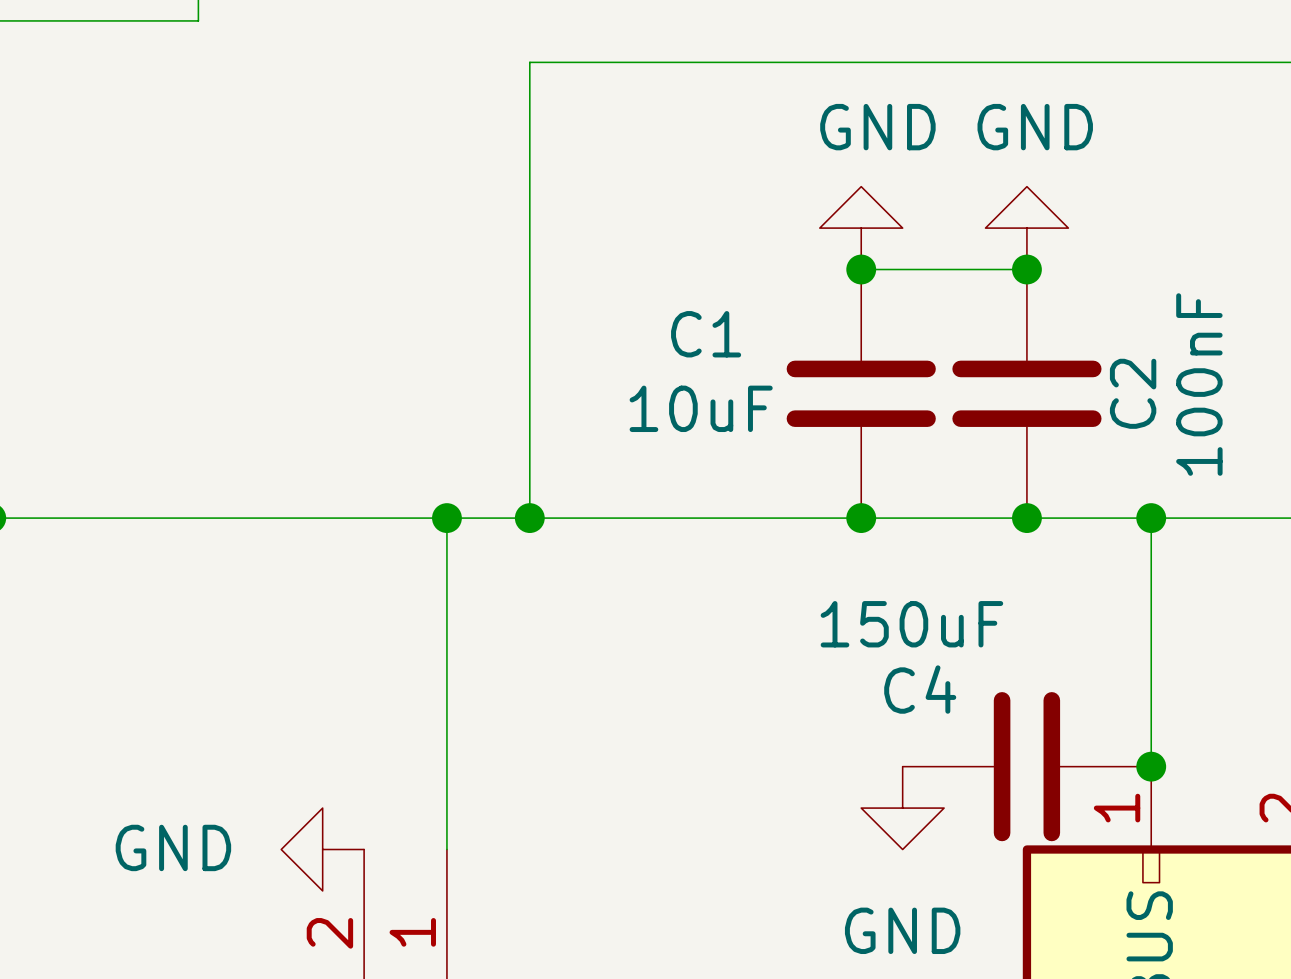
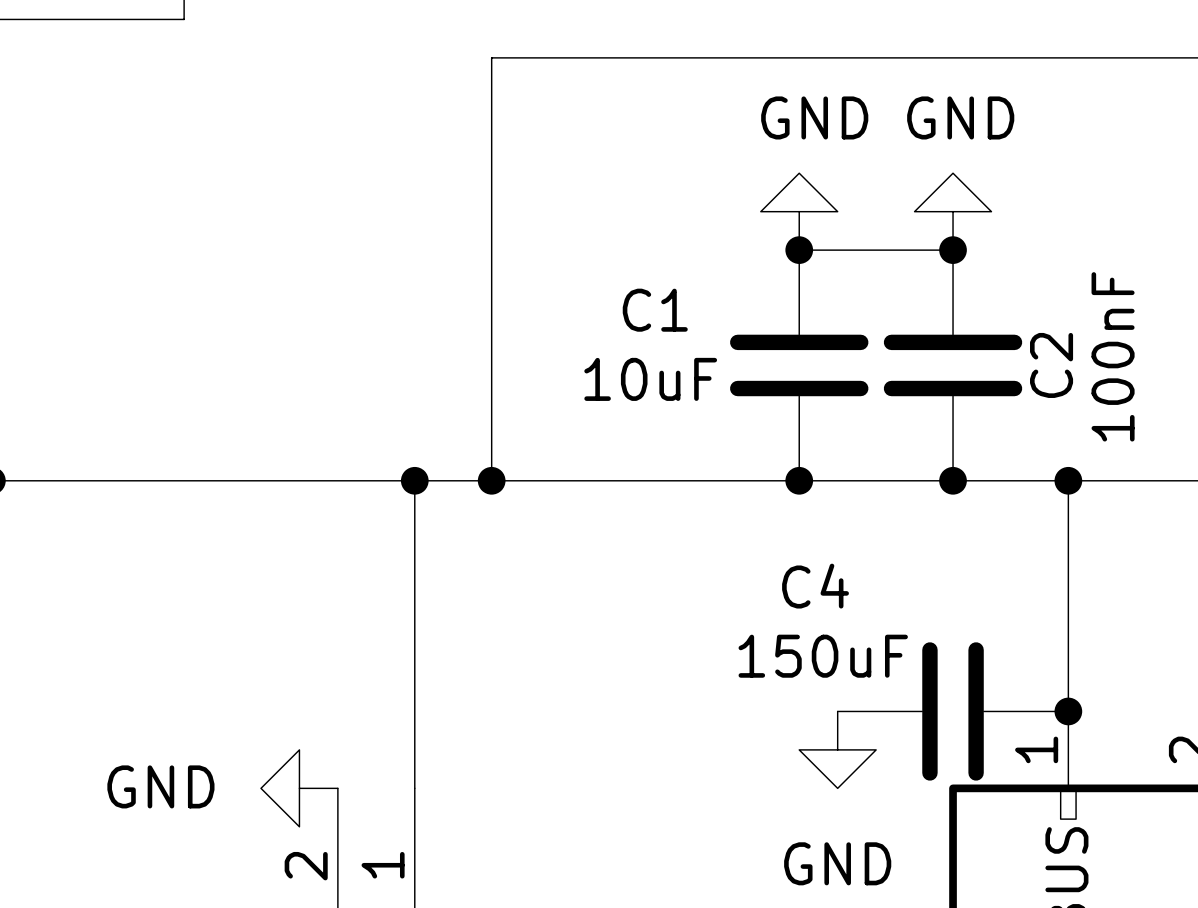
C4 value position: 150uF (911, 624) -> 150uF (823, 656)
C4 name position: C4 (920, 689) -> C4 (815, 586)

